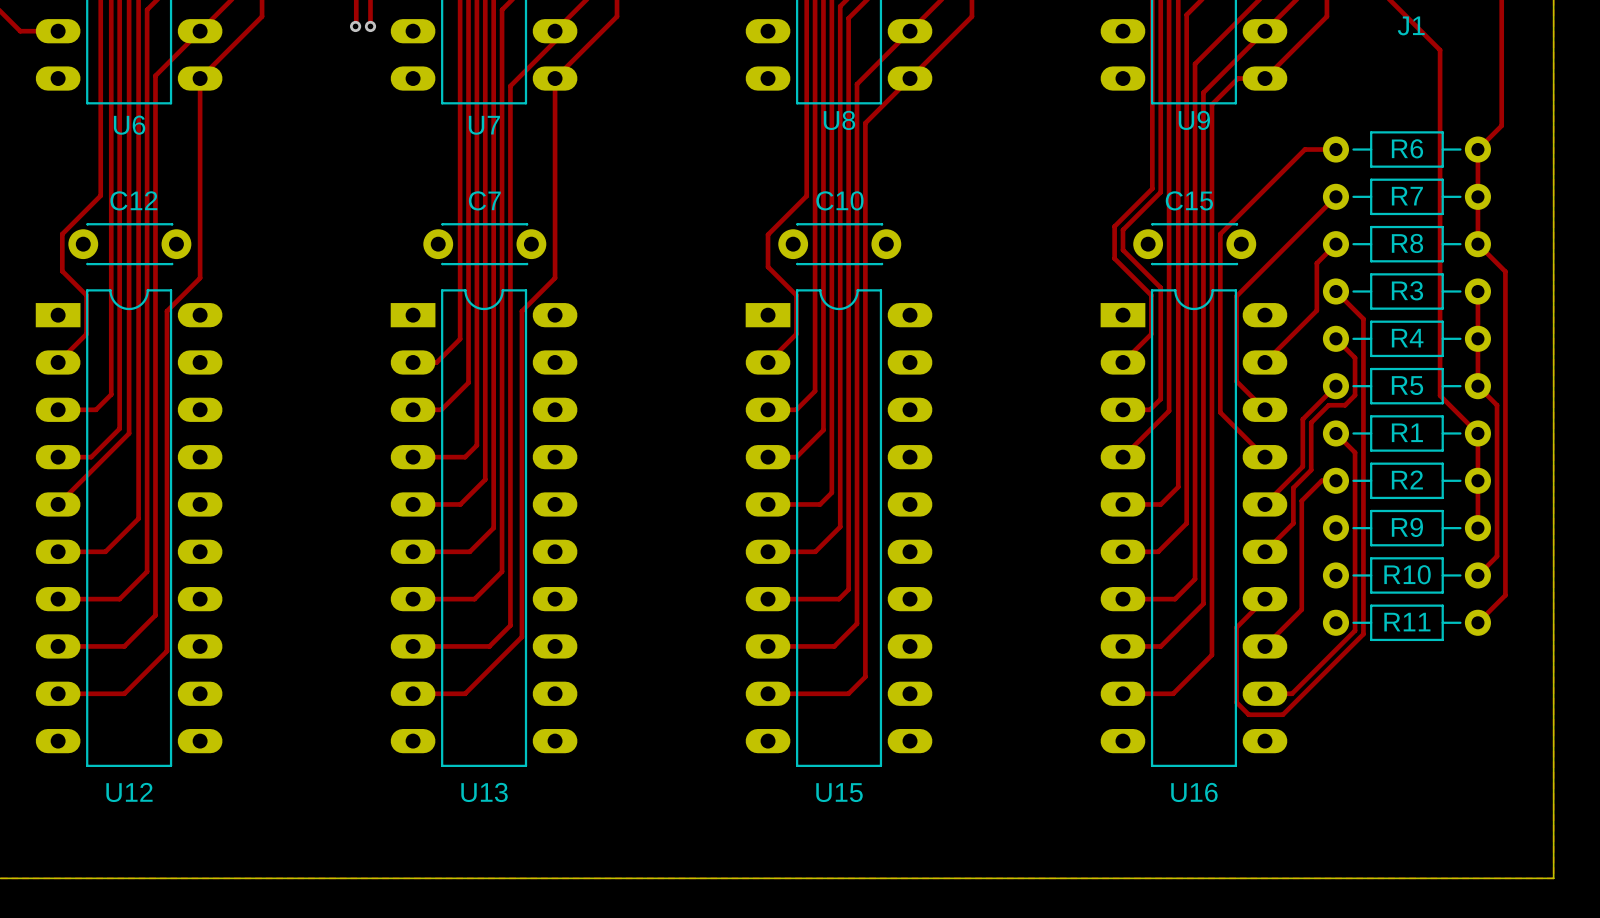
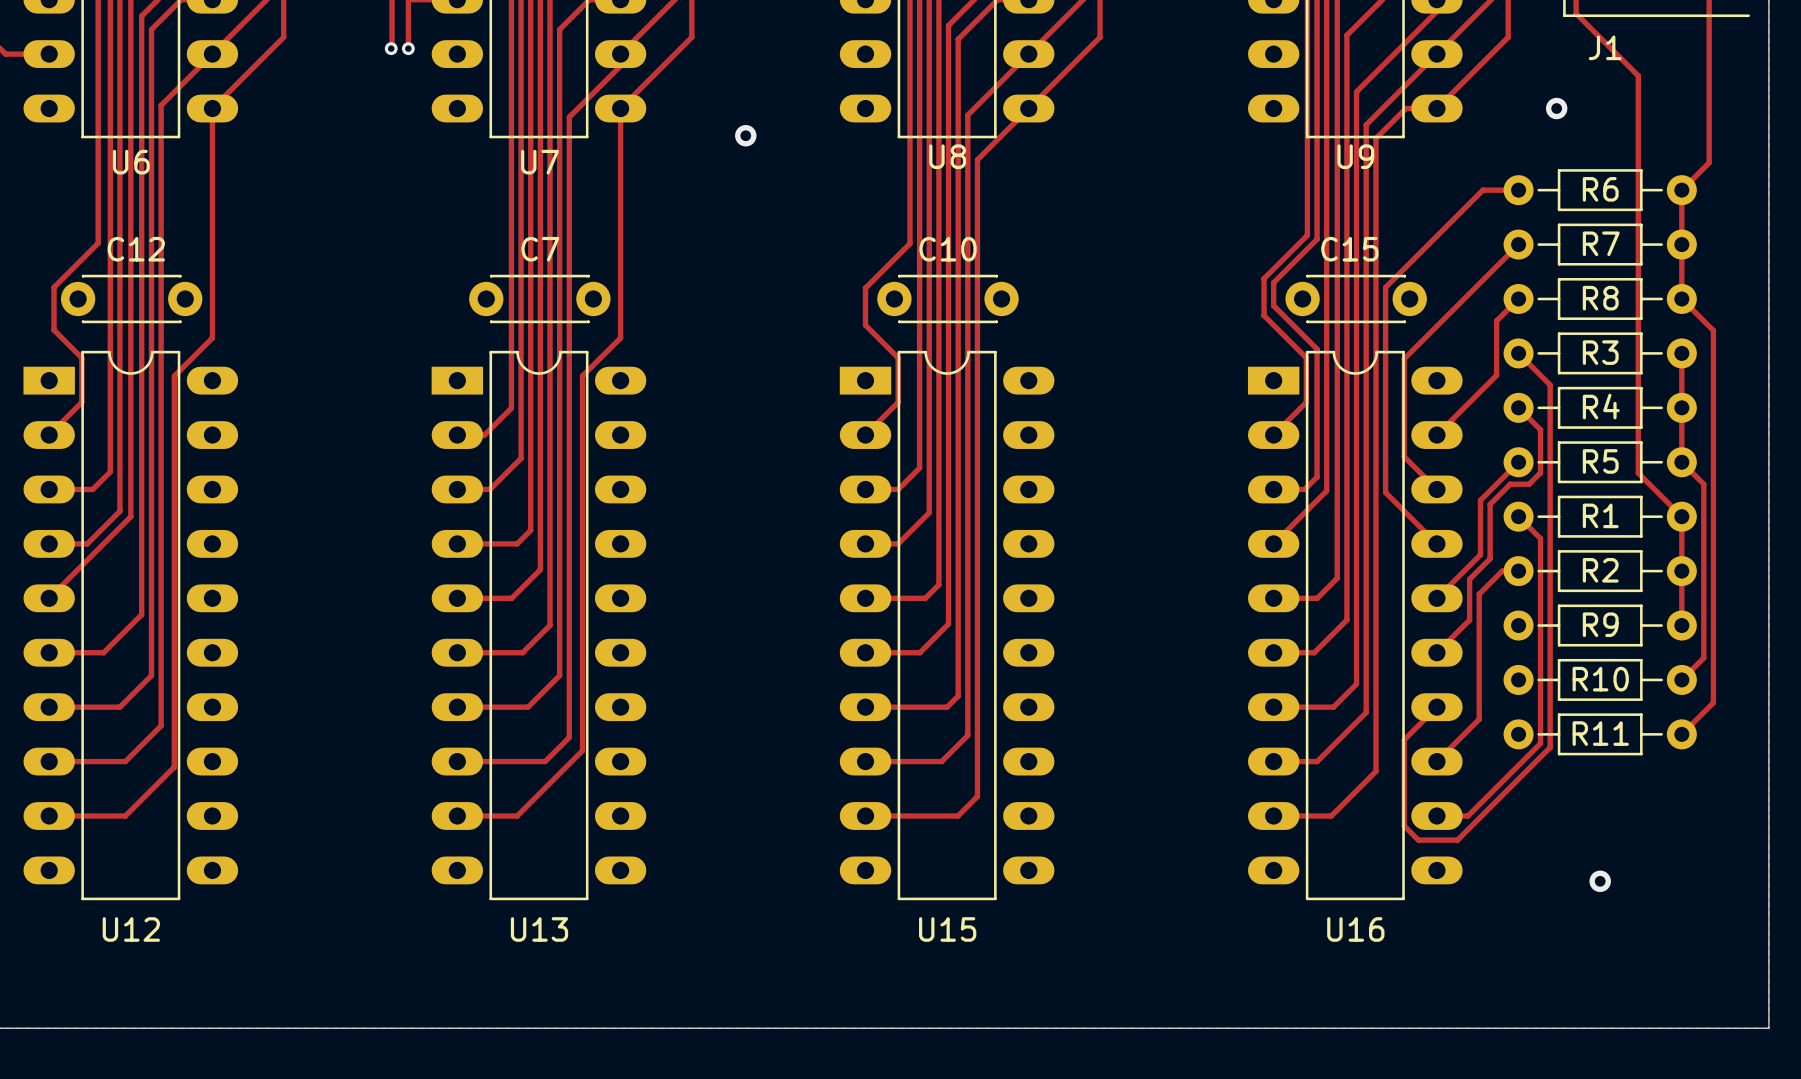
via: none -> (1556, 108)
via: none -> (745, 135)
via: none -> (1600, 881)

